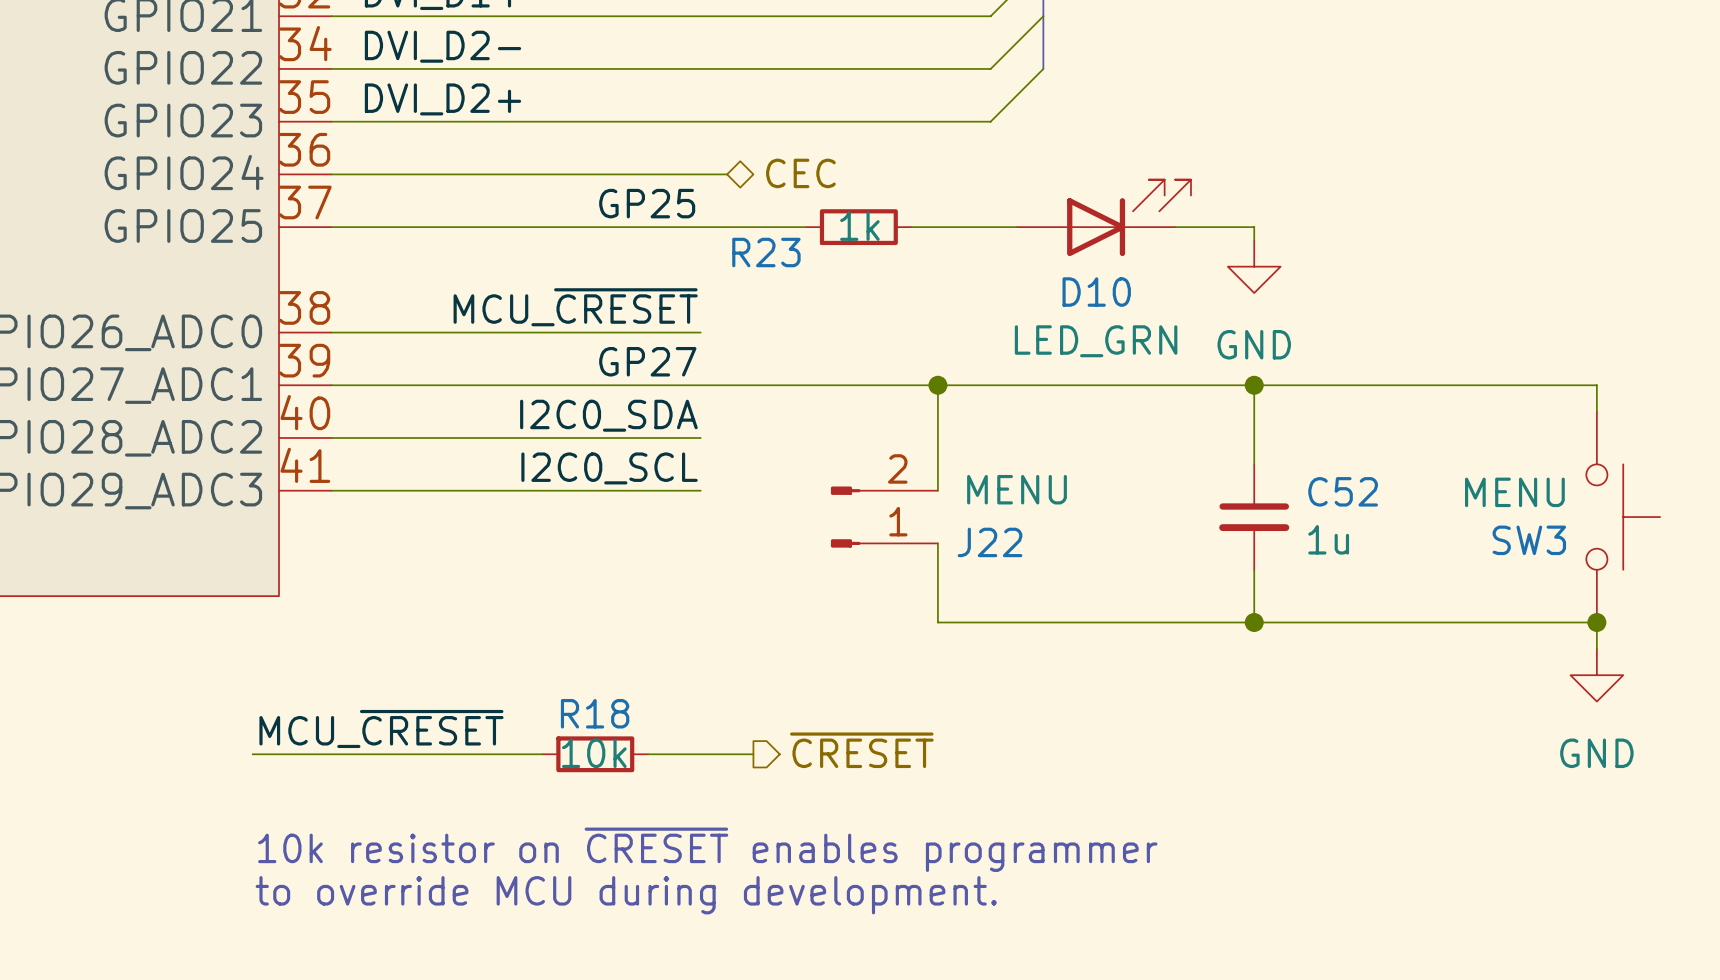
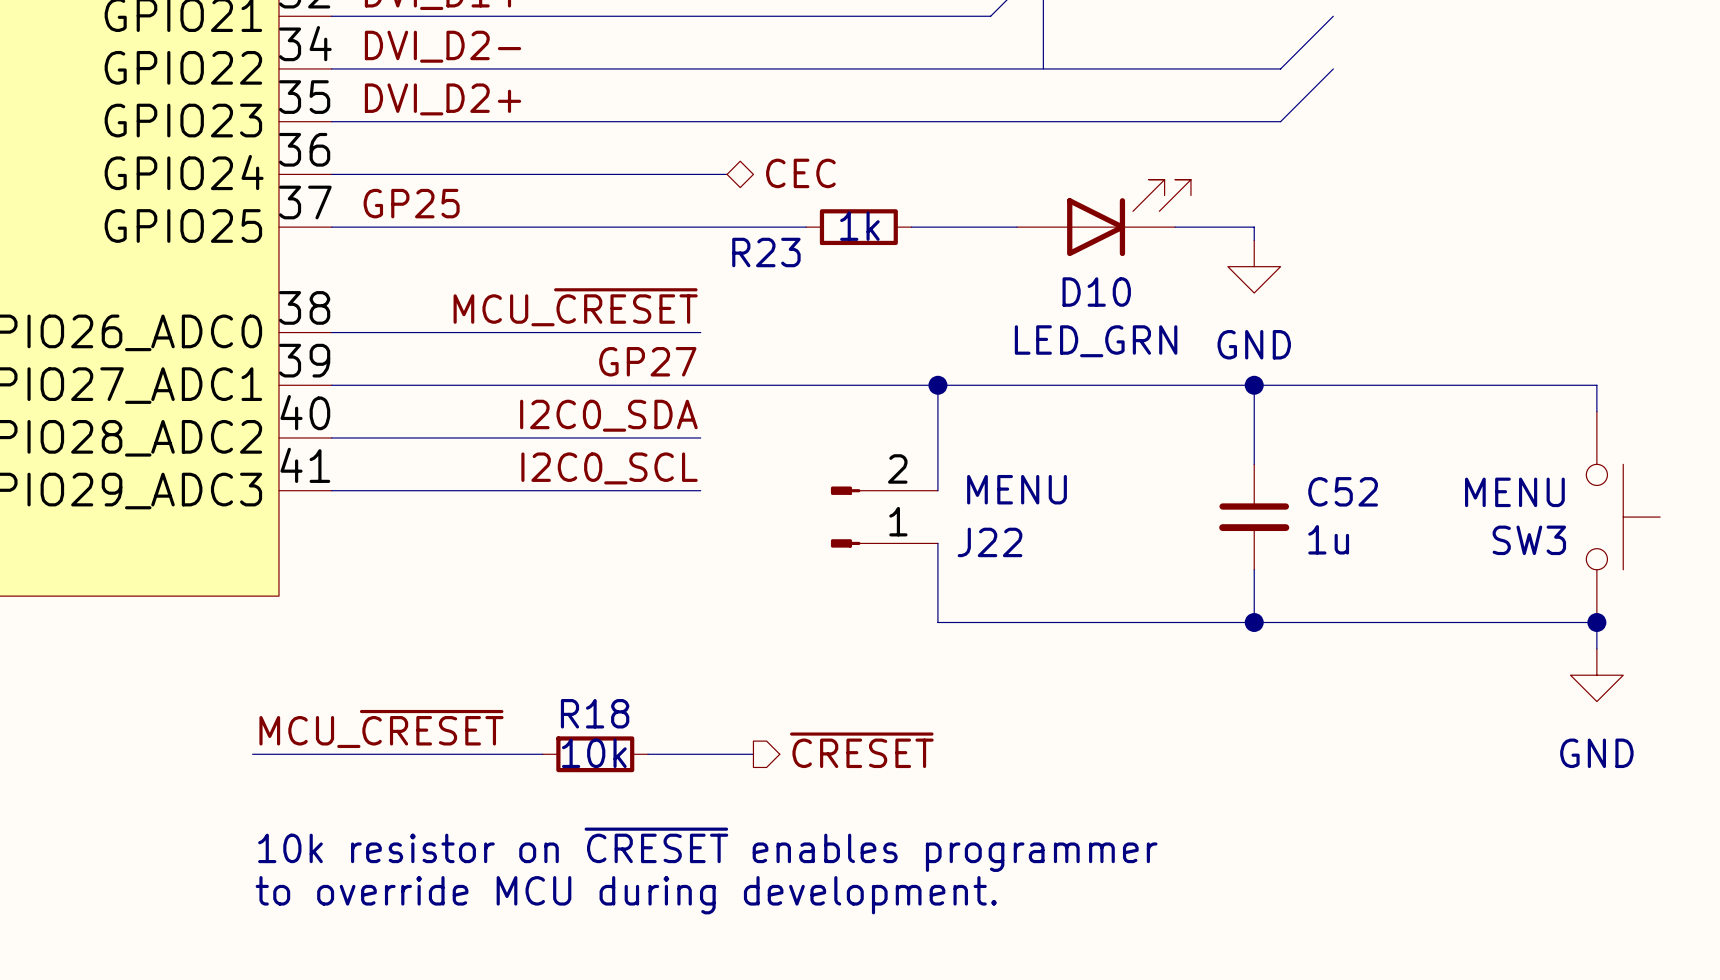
wire: (1043, 16) (990, 68) -> (1333, 16) (1280, 68) (990, 68)
wire: (1043, 68) (990, 121) -> (1333, 68) (1280, 121) (990, 121)
label position: GP25 (647, 203) -> GP25 (411, 203)

